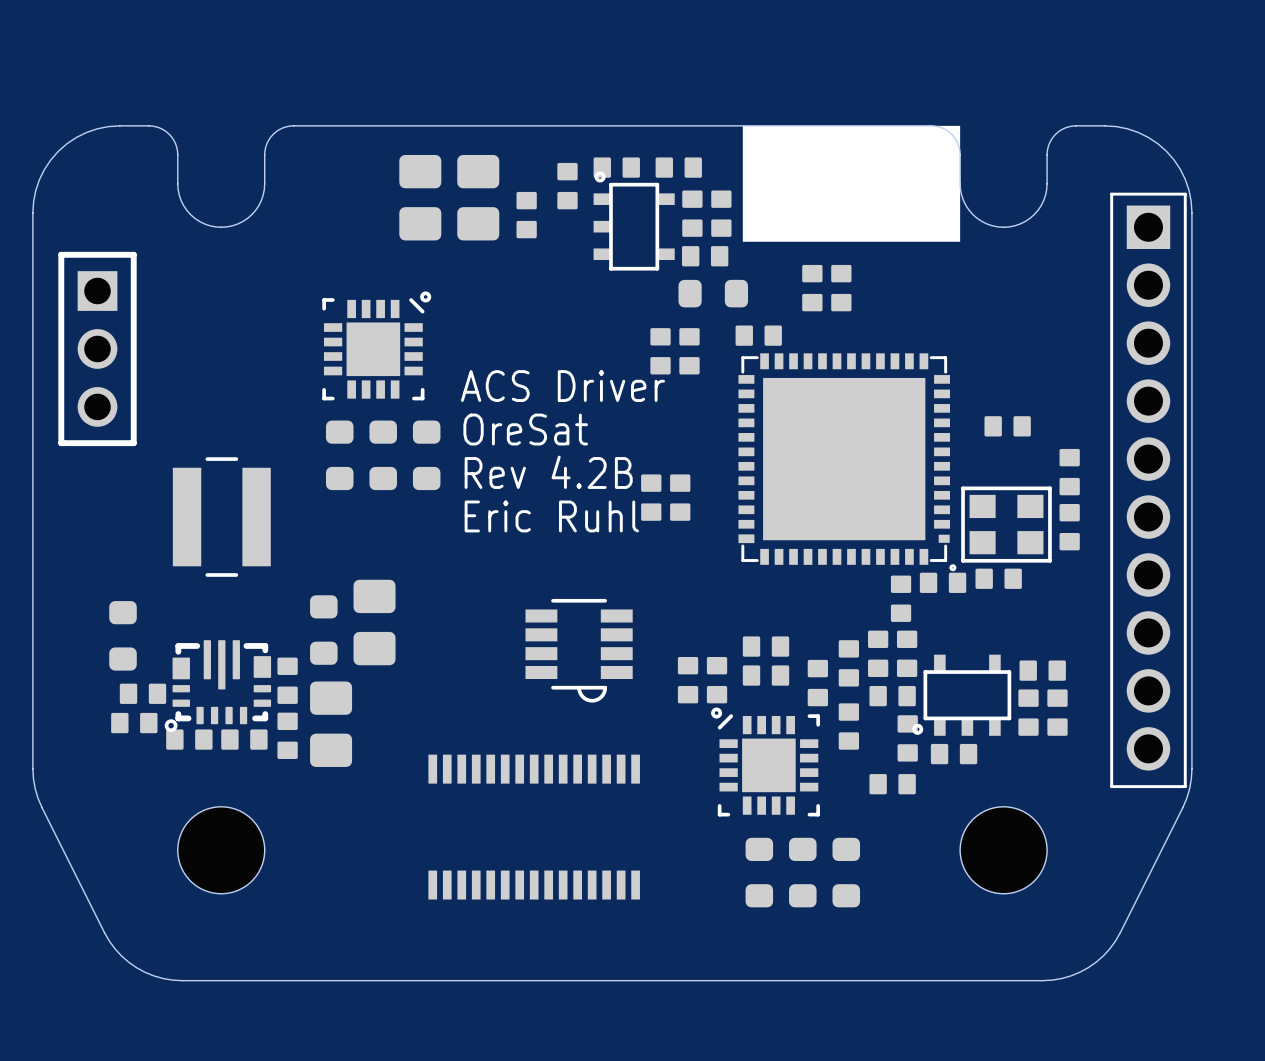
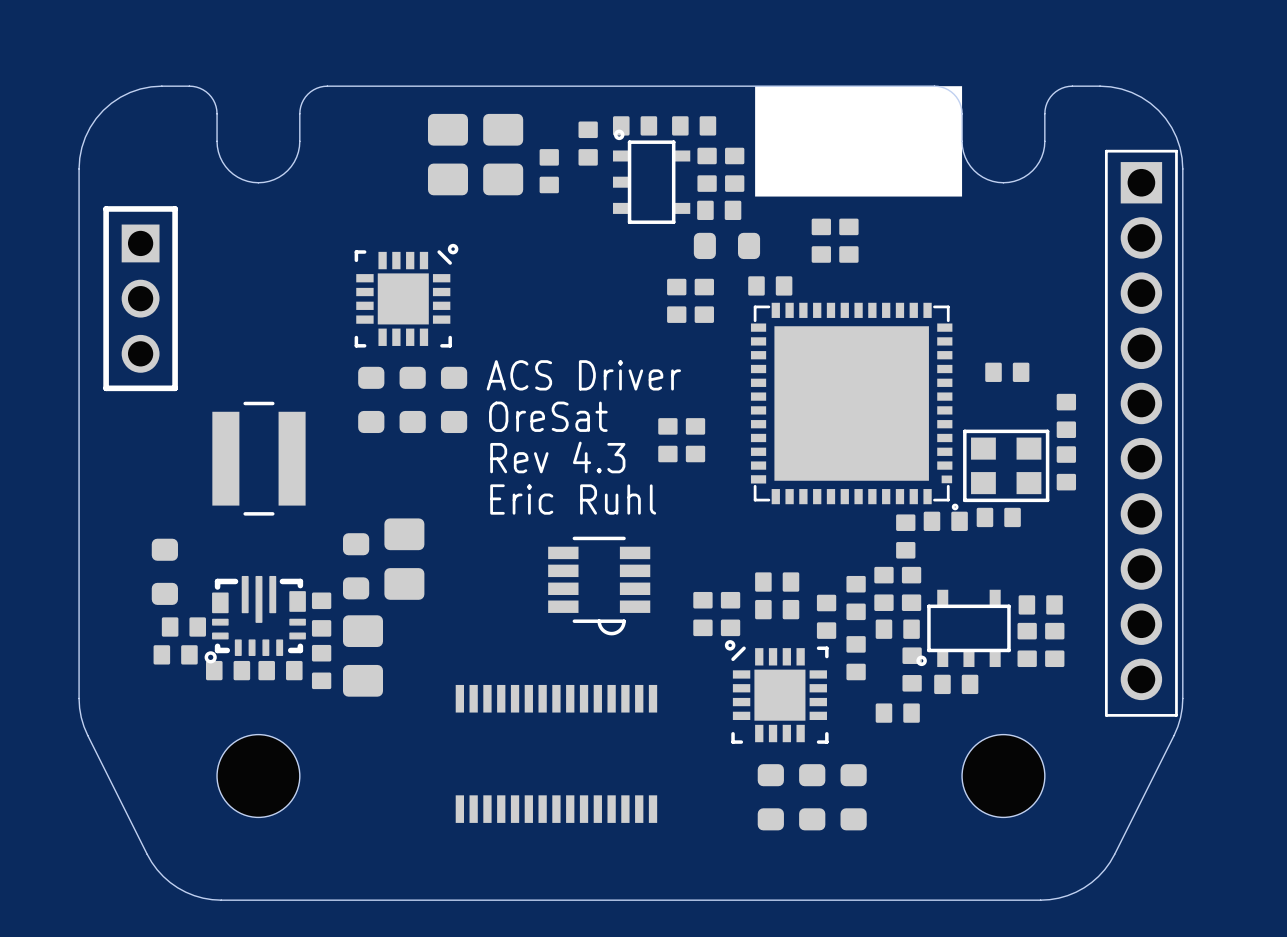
text: ACS Driver (562, 386) -> none
text: OreSat (525, 429) -> ACS Driver (583, 375)
text: Rev 4.2B (548, 472) -> OreSat (548, 416)
text: Eric Ruhl (551, 516) -> Rev 4.3 (557, 457)
text: none -> Eric Ruhl (573, 499)

